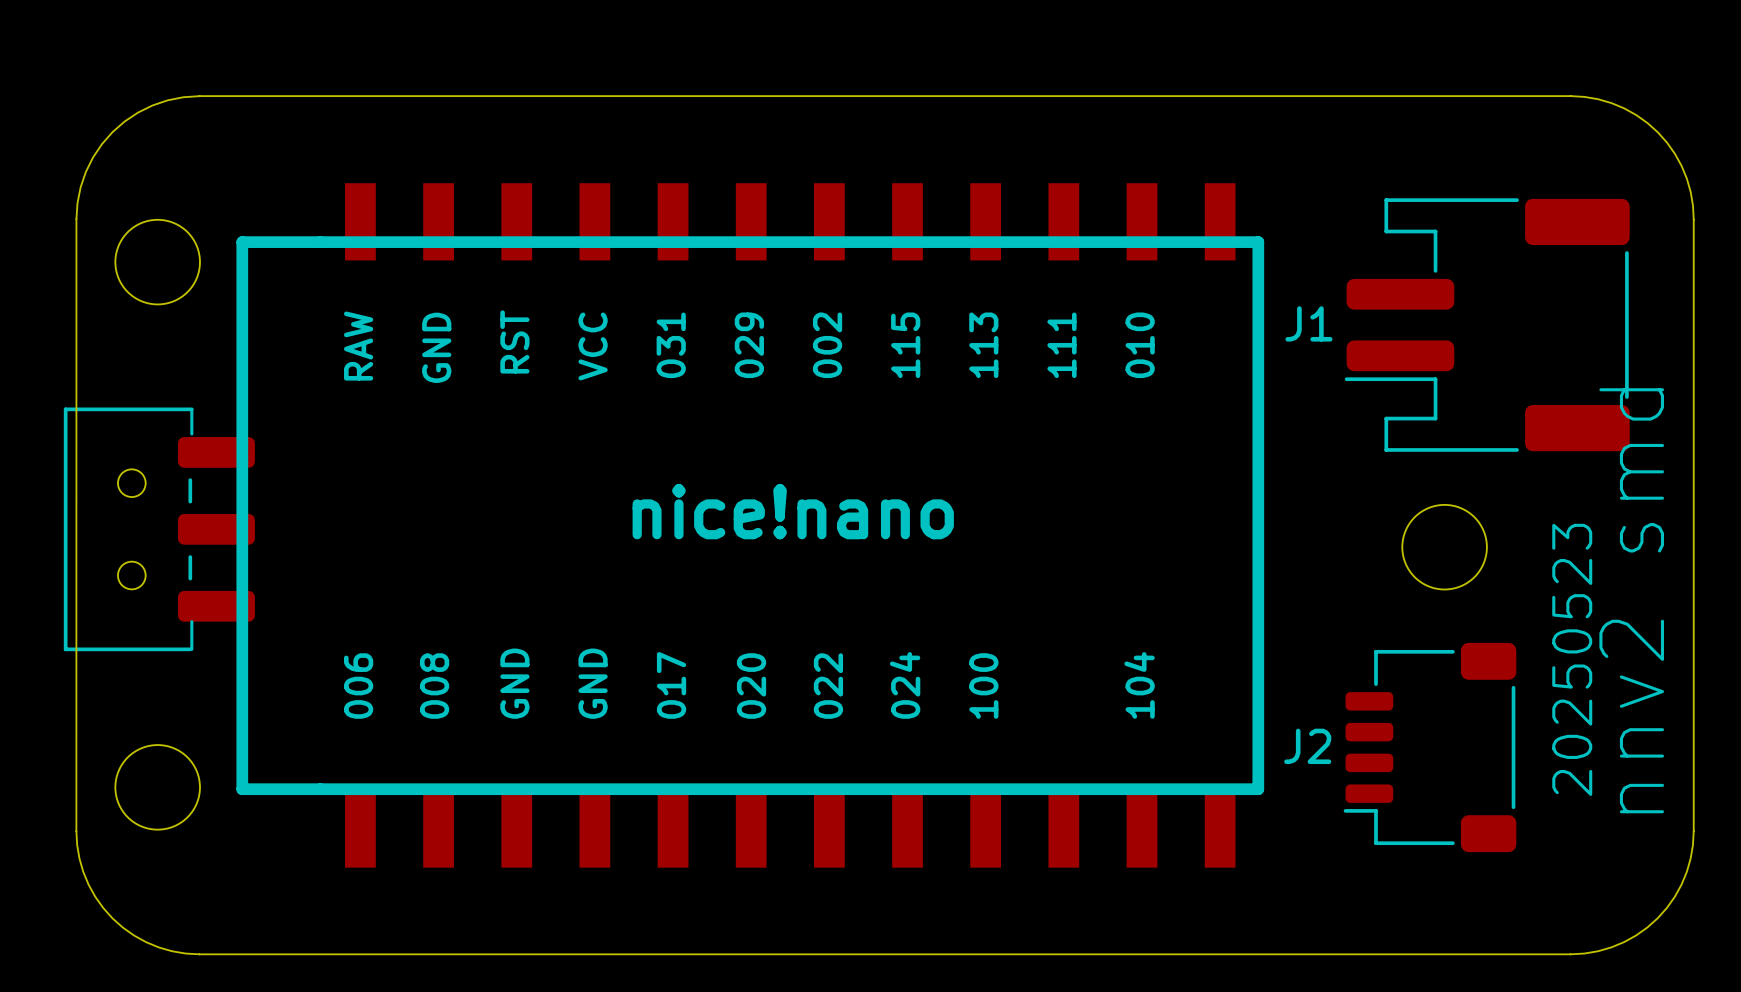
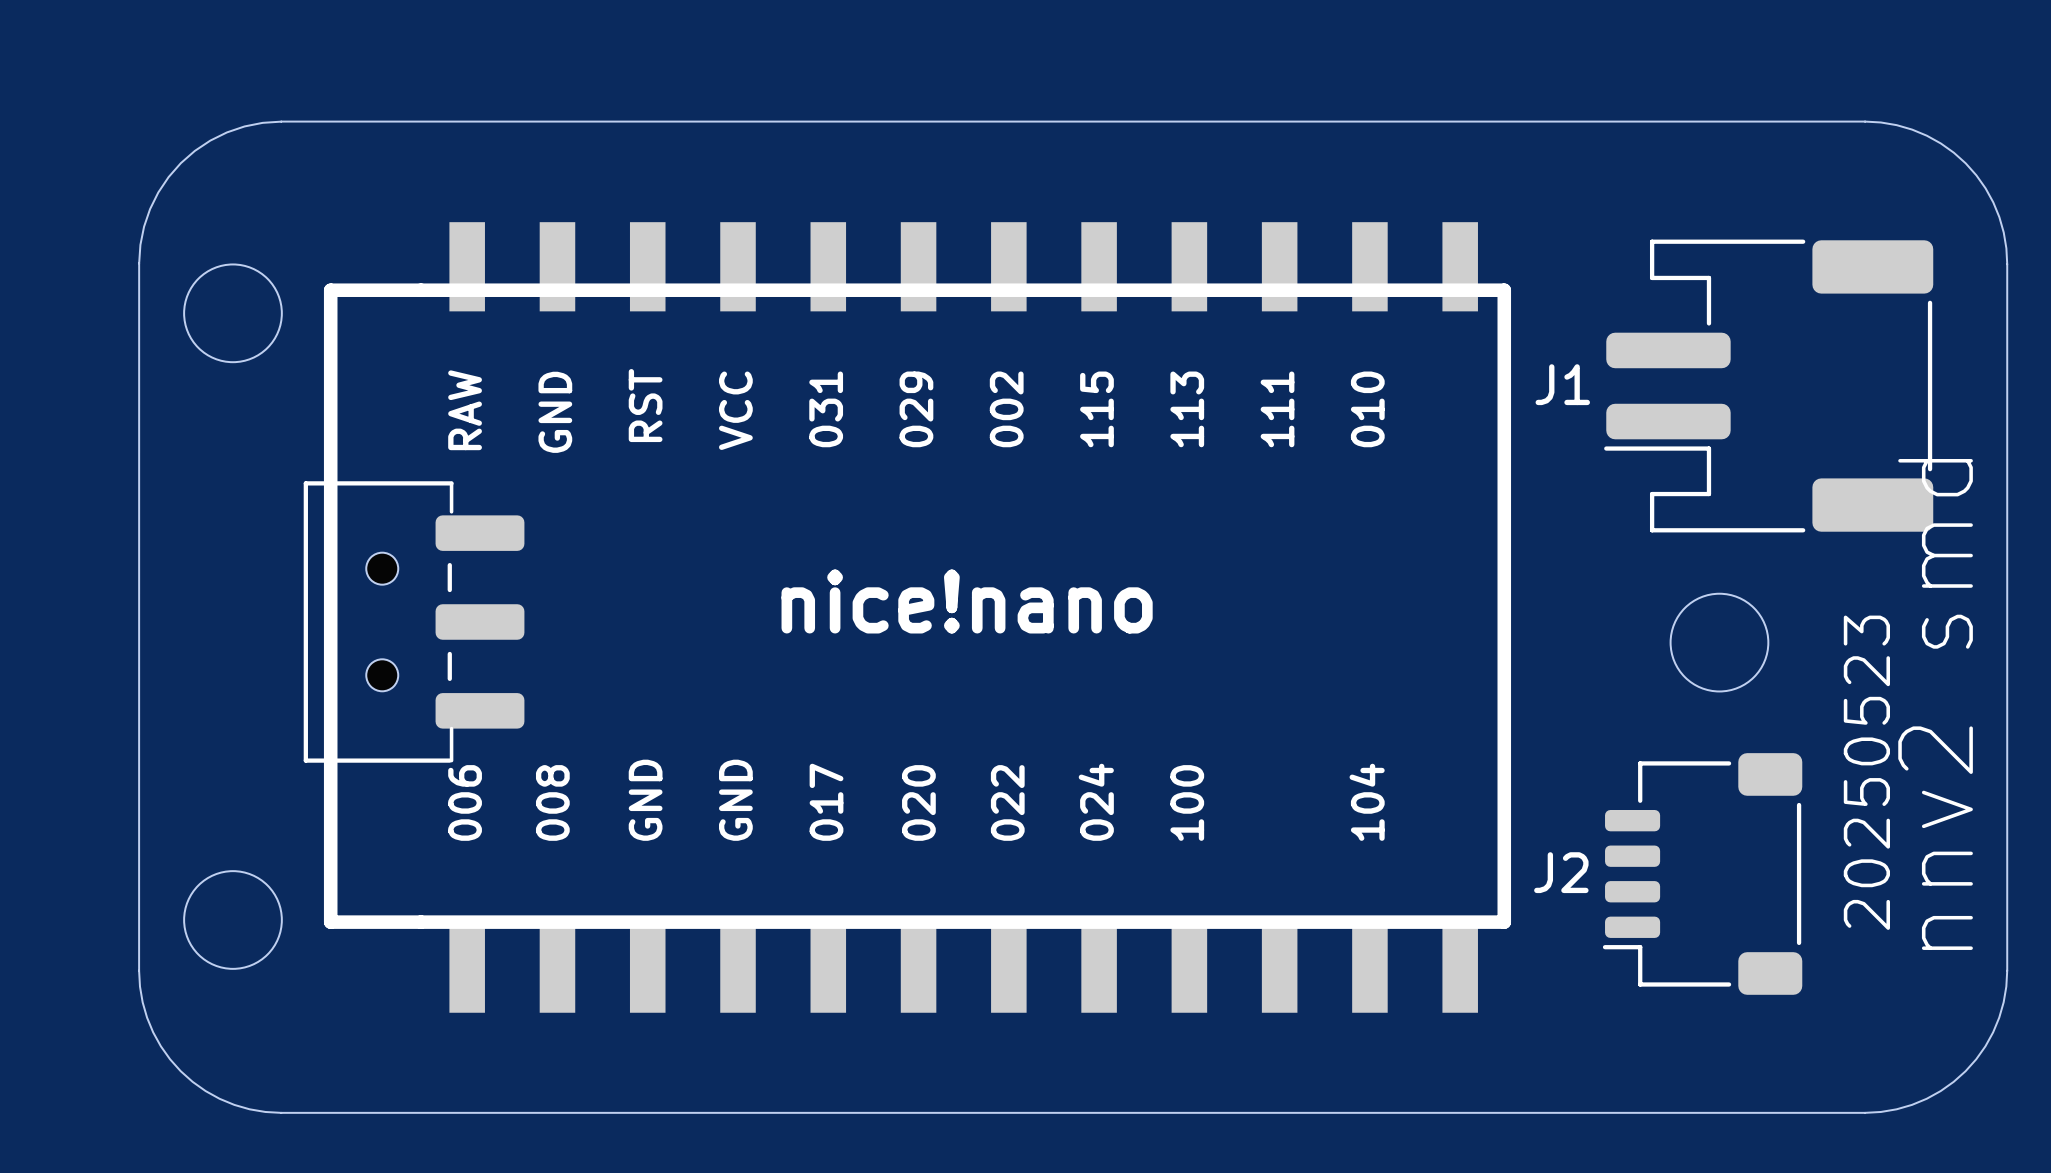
part position: (159, 529) -> (414, 621)

